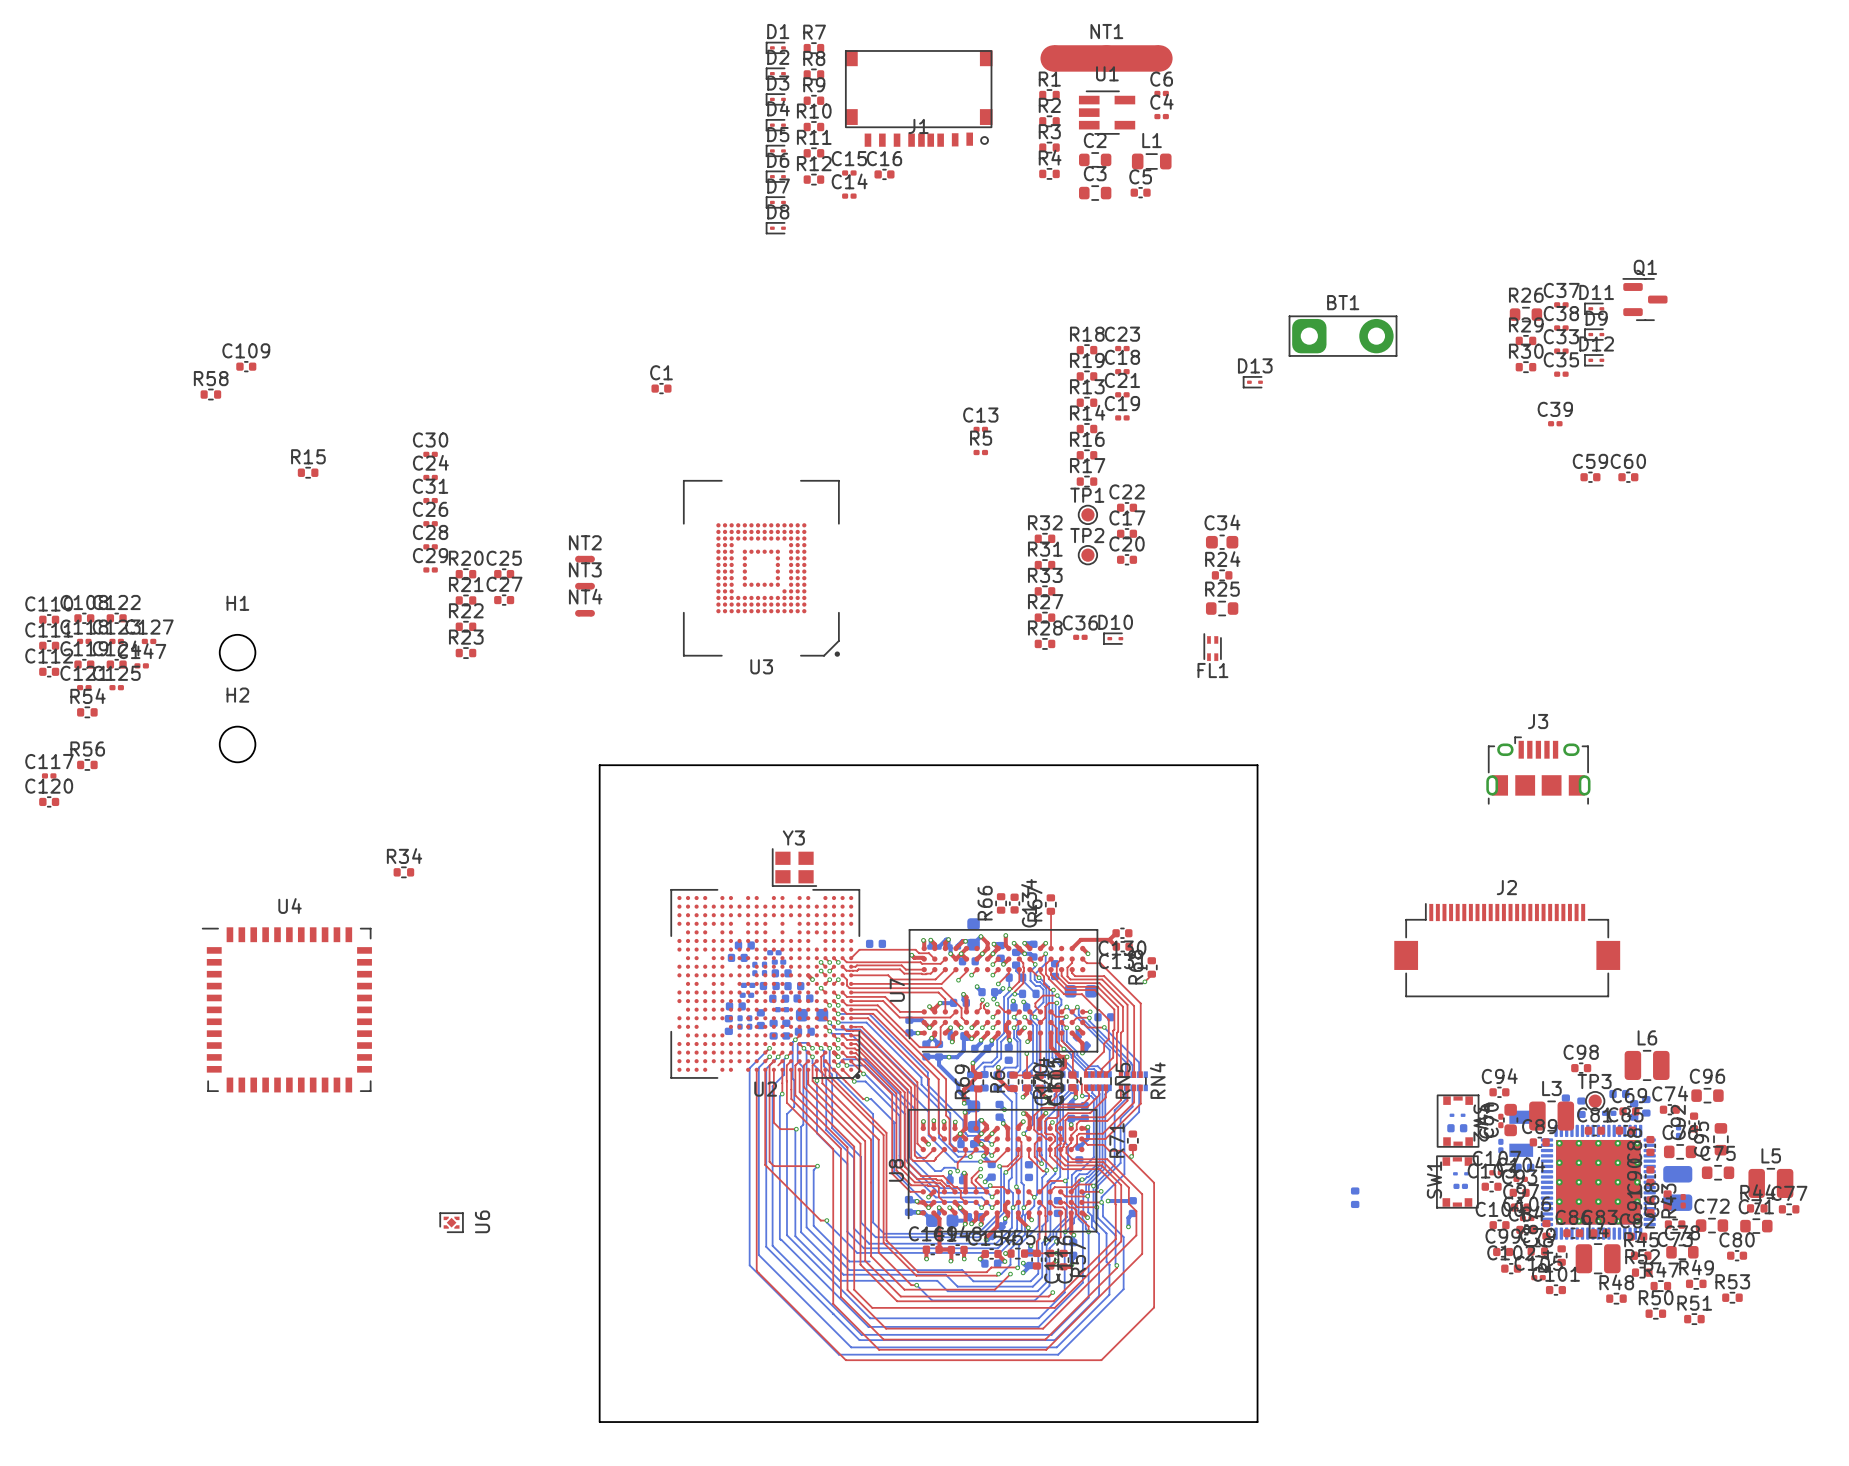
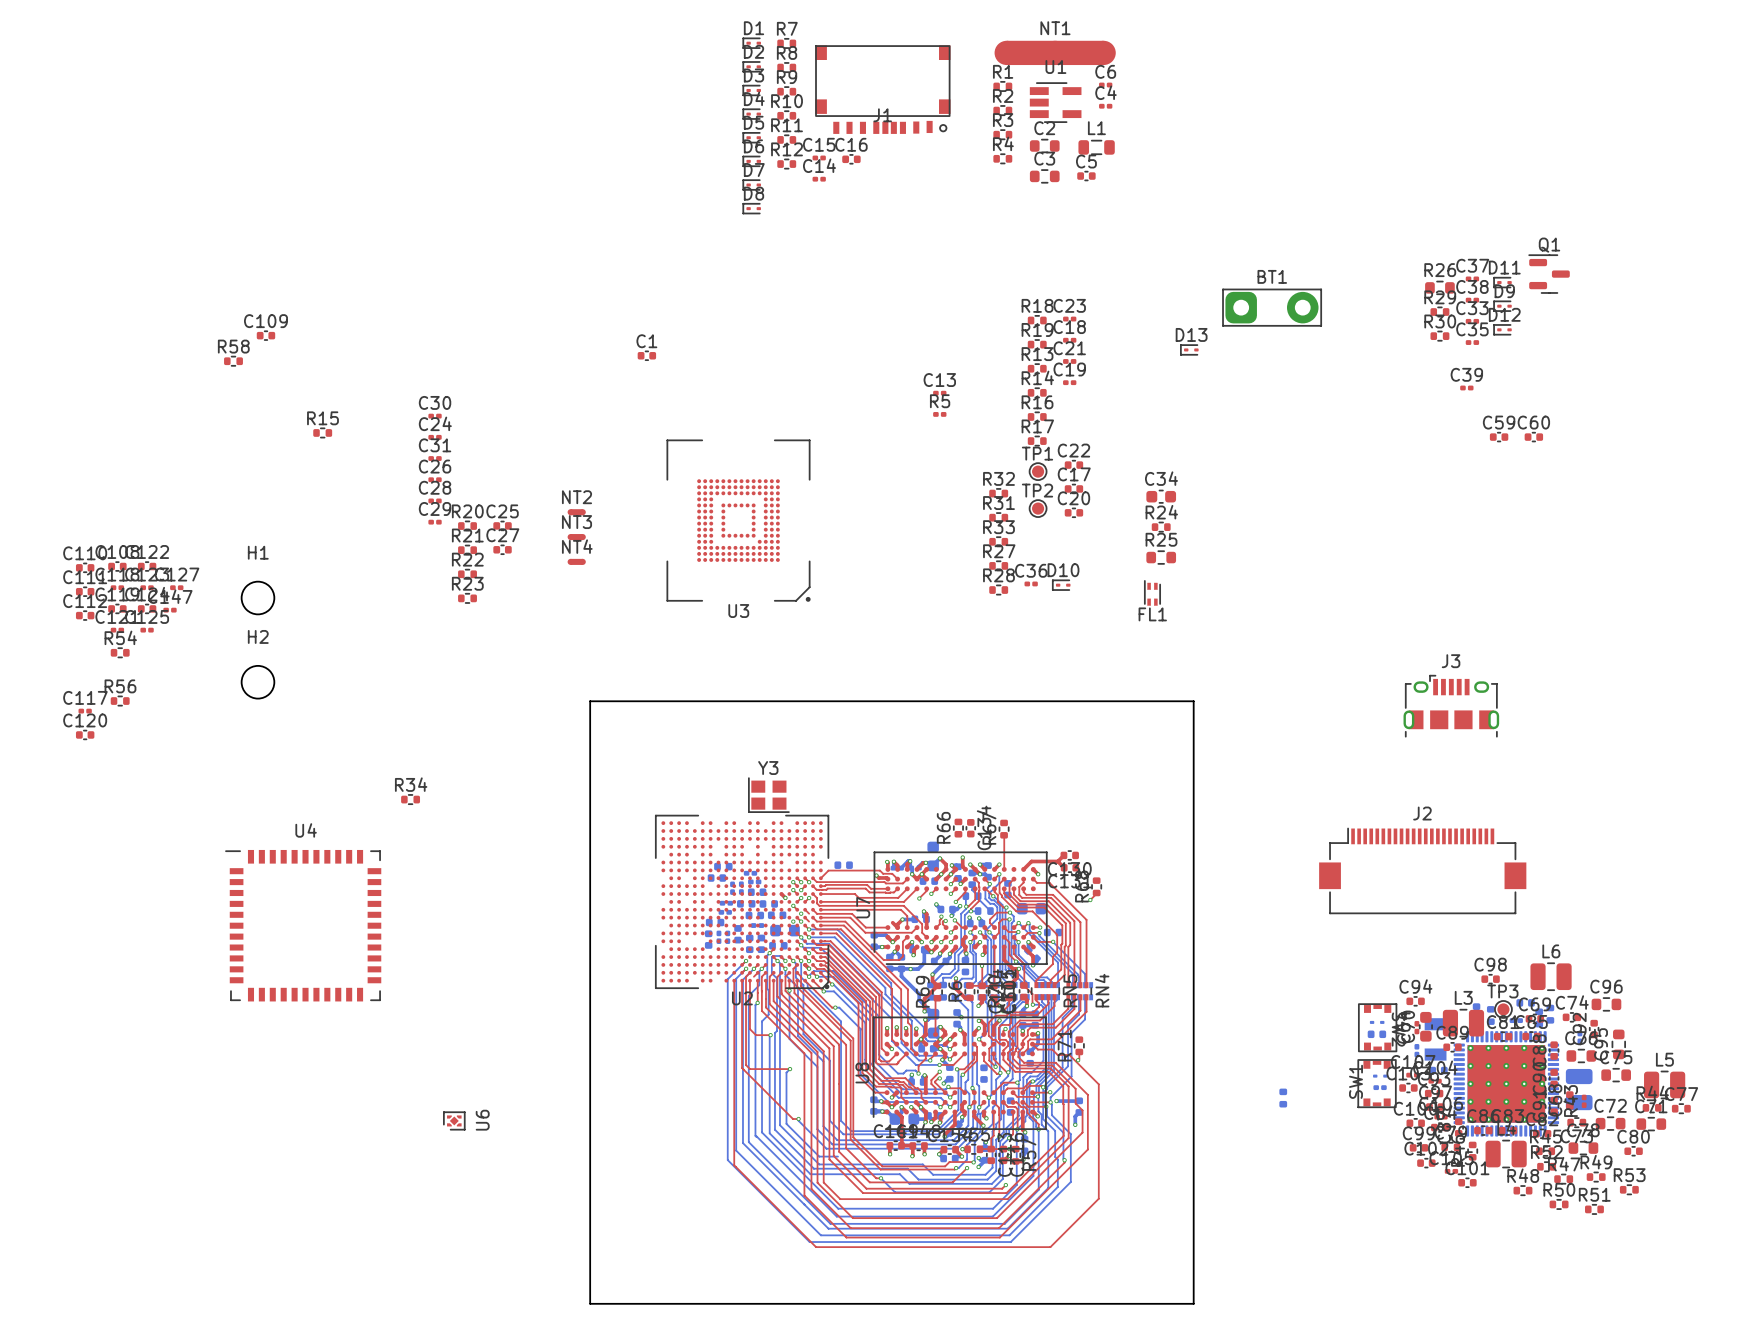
via: none -> (801, 913)
via: (838, 996) -> none
via: none -> (793, 921)
via: (838, 1005) -> none
via: (929, 1006) -> none

